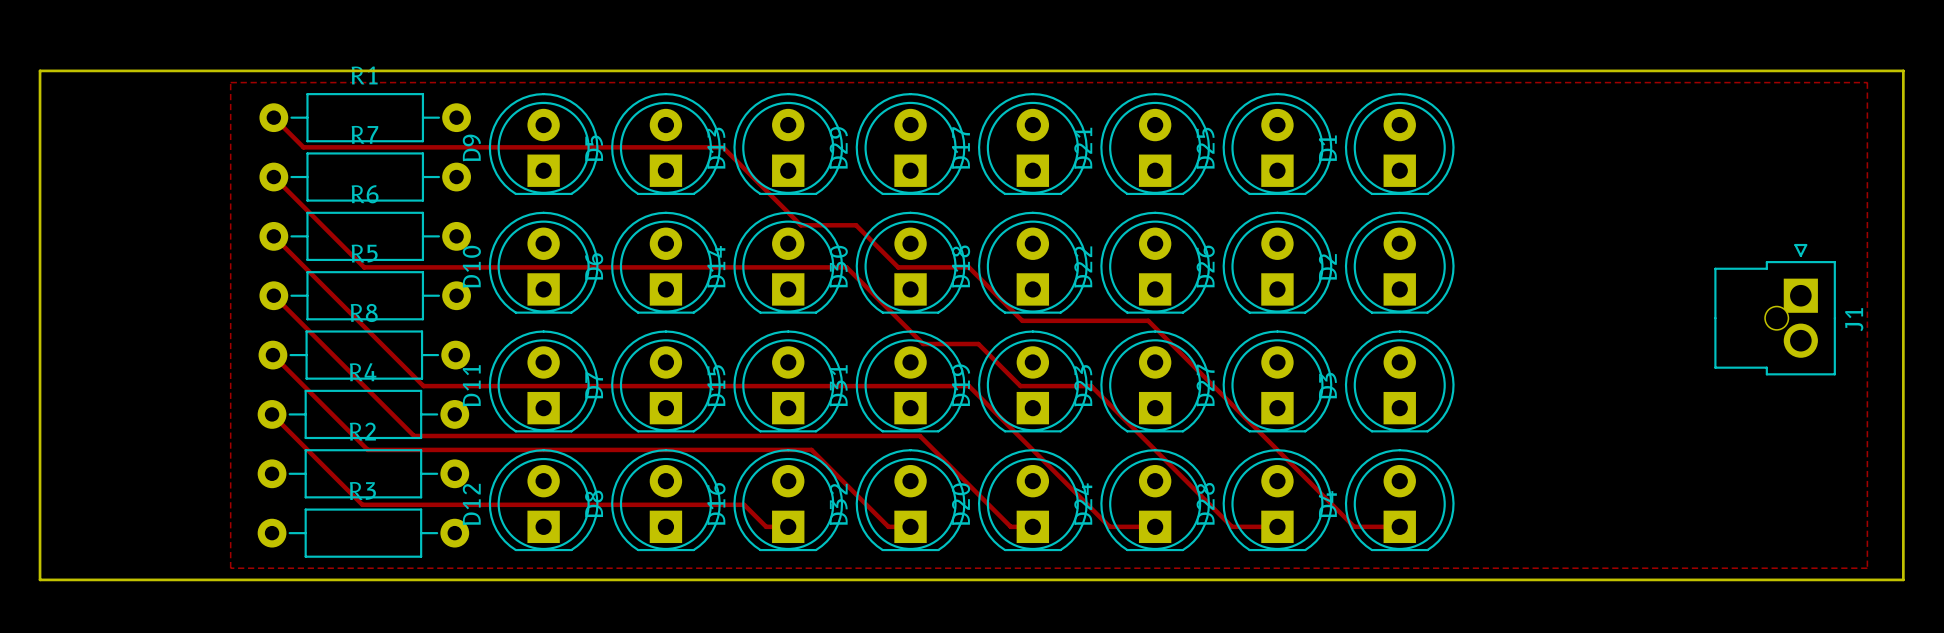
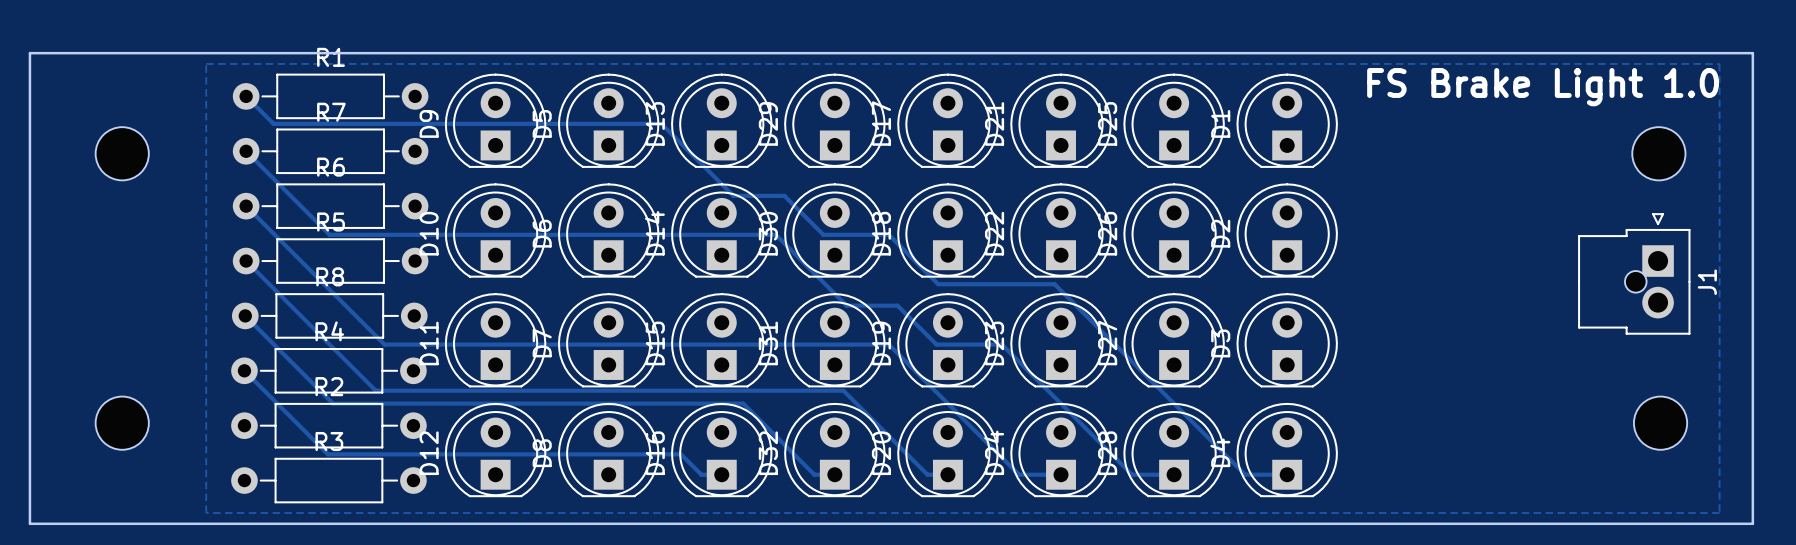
text: none -> FS Brake Light 1.0 (1543, 87)
part: none -> (122, 153)
part: none -> (1658, 153)
part: none -> (122, 423)
part: none -> (1660, 423)

